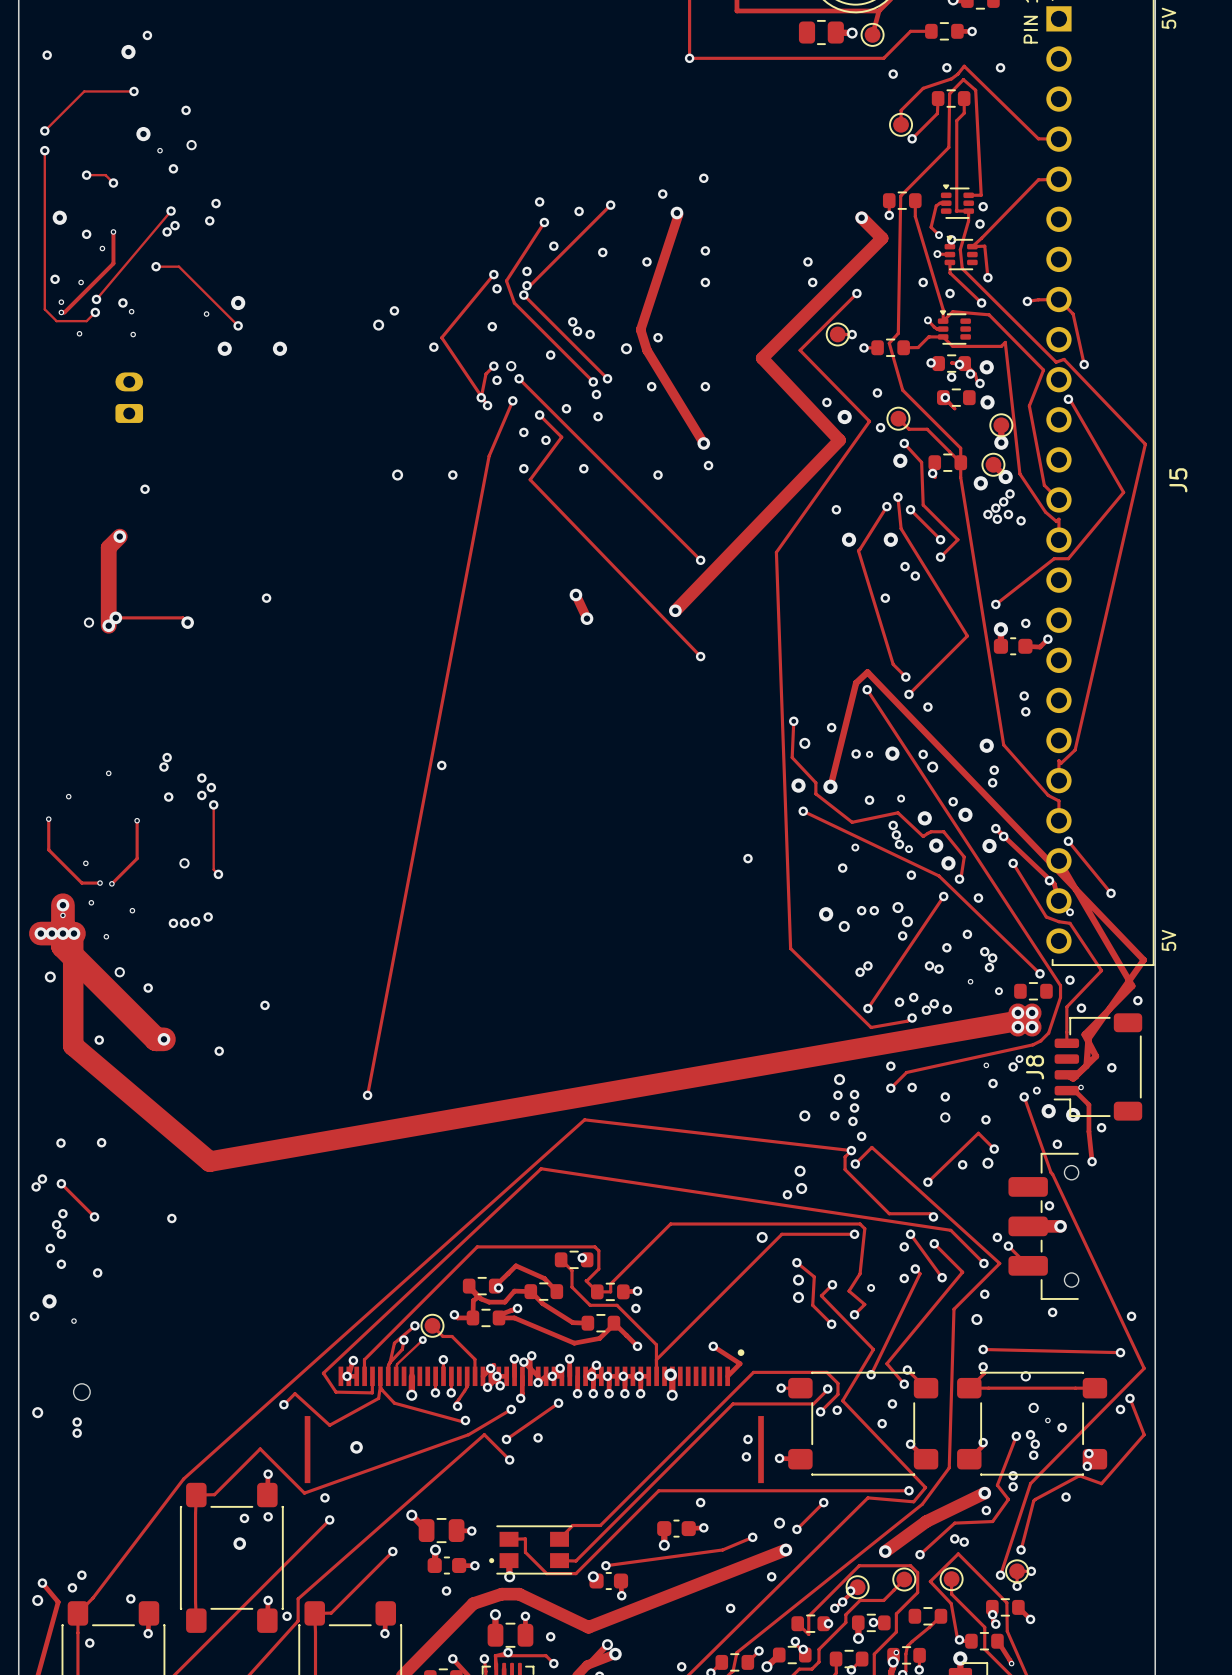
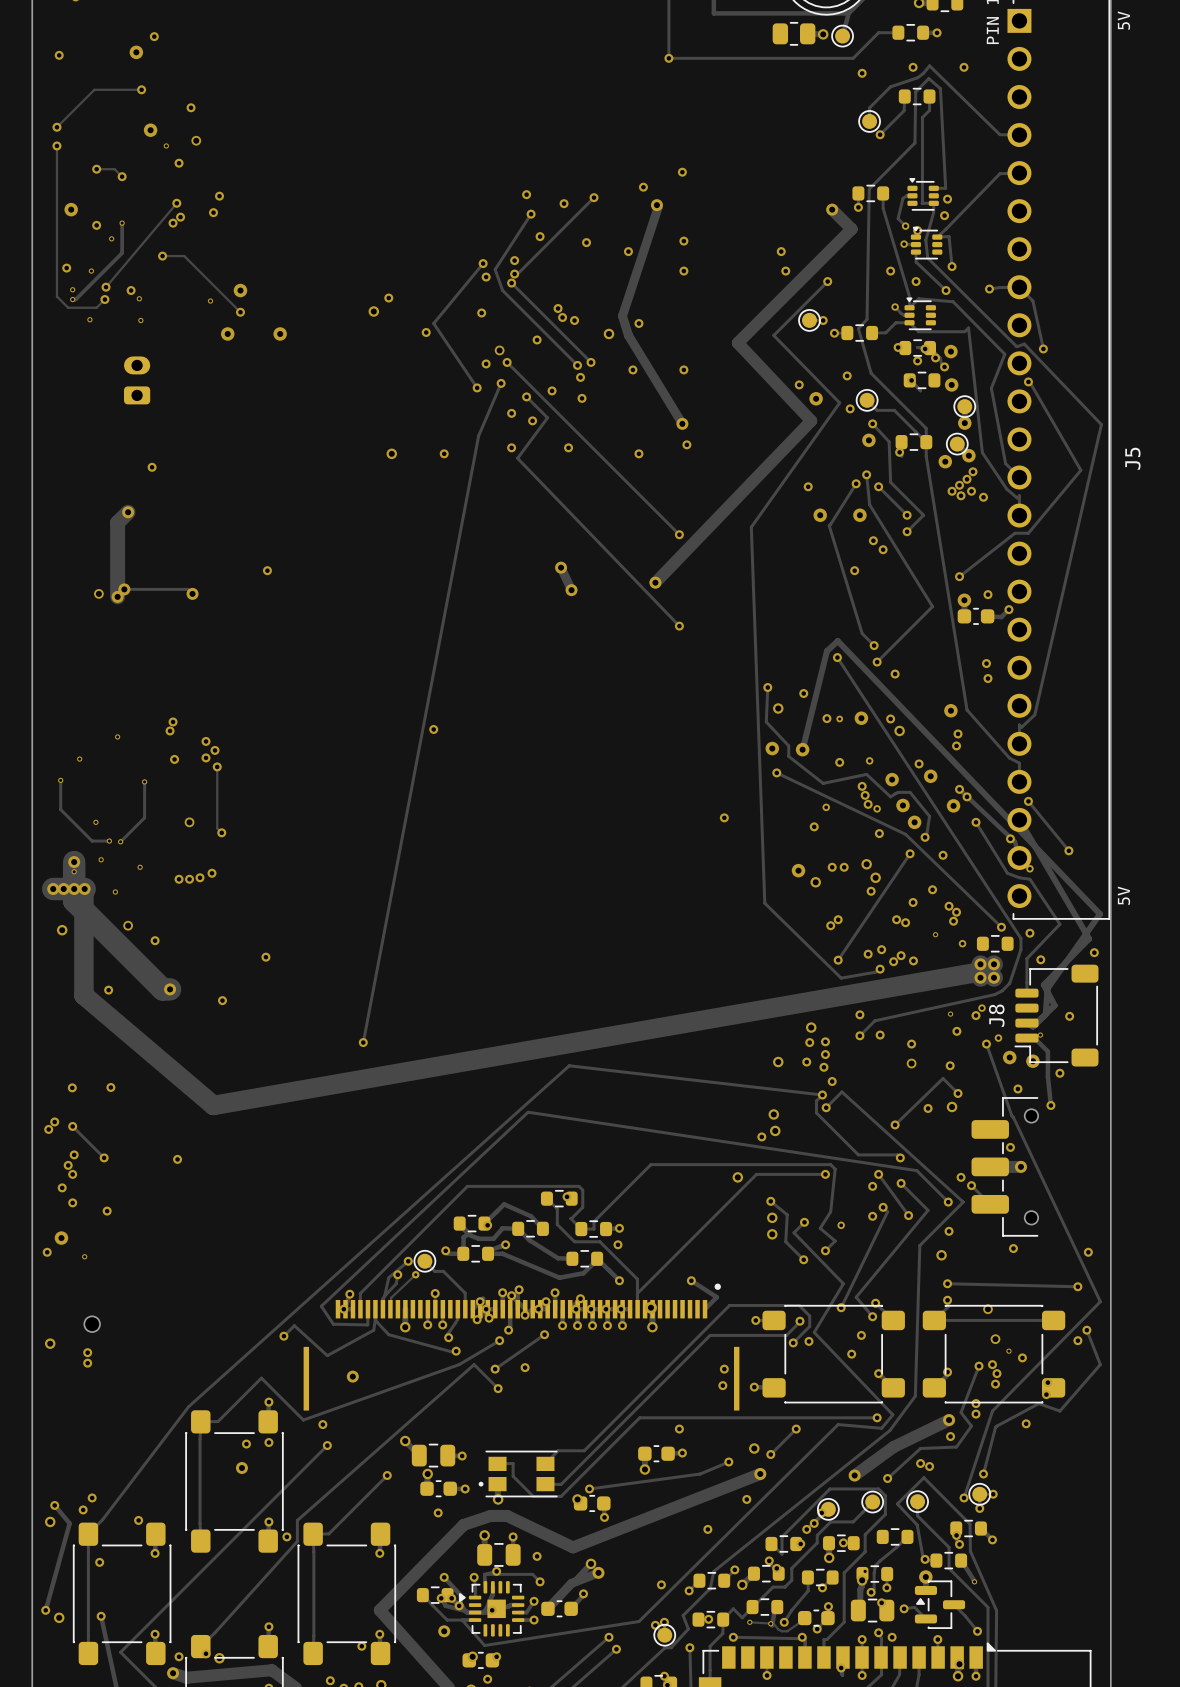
track: (493, 366) (485, 374) (481, 397) -> none
via: (493, 366) -> none
via: (481, 397) -> none

